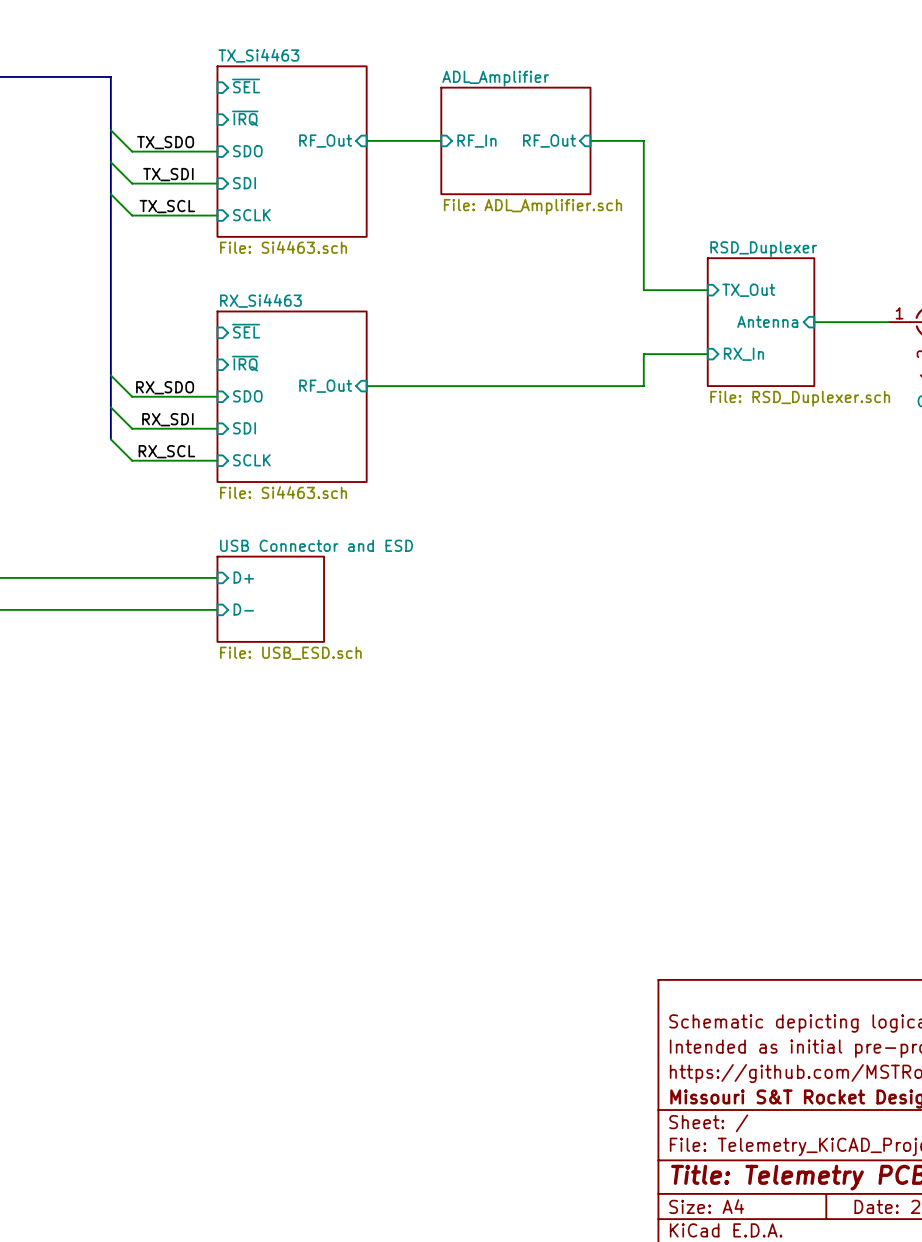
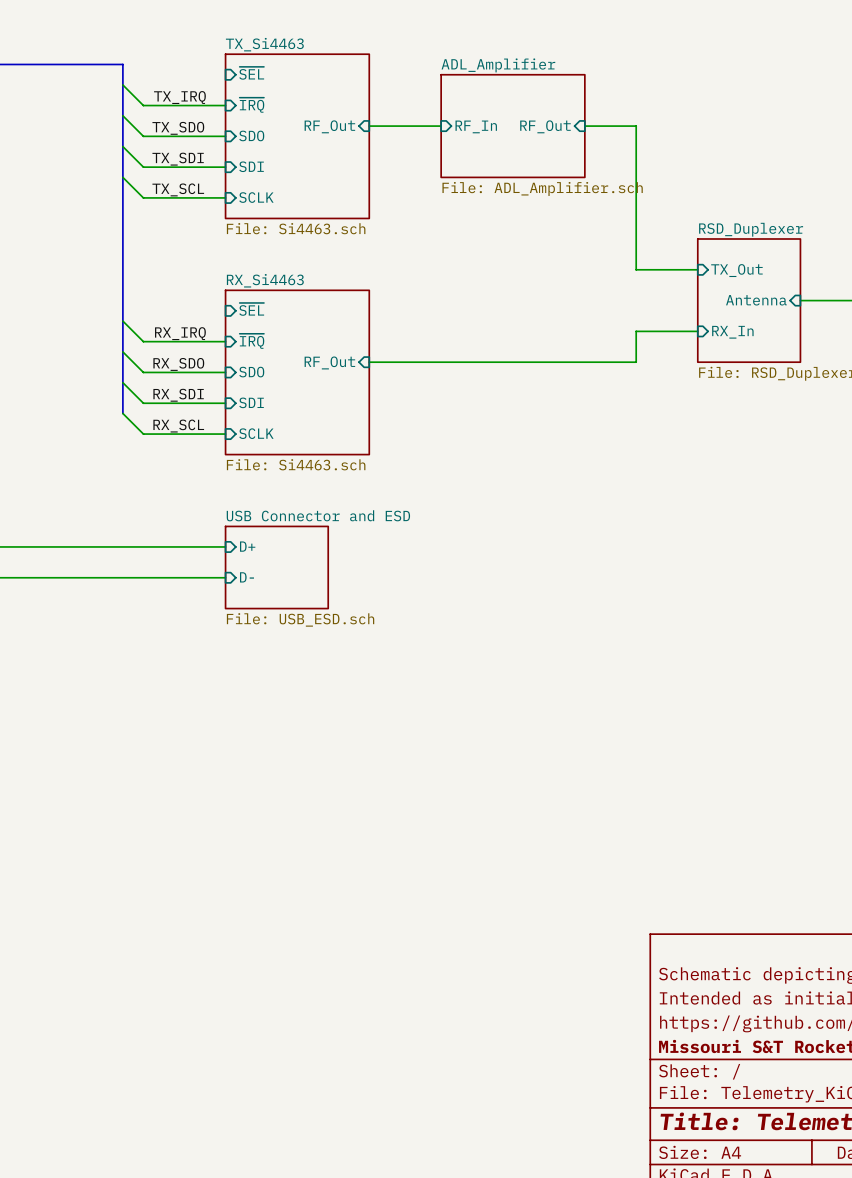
wire: none -> (122, 85) (143, 105) (225, 105)
label: none -> TX_IRQ (179, 97)
wire: none -> (122, 321) (143, 341) (225, 341)
label: none -> RX_IRQ (180, 333)

